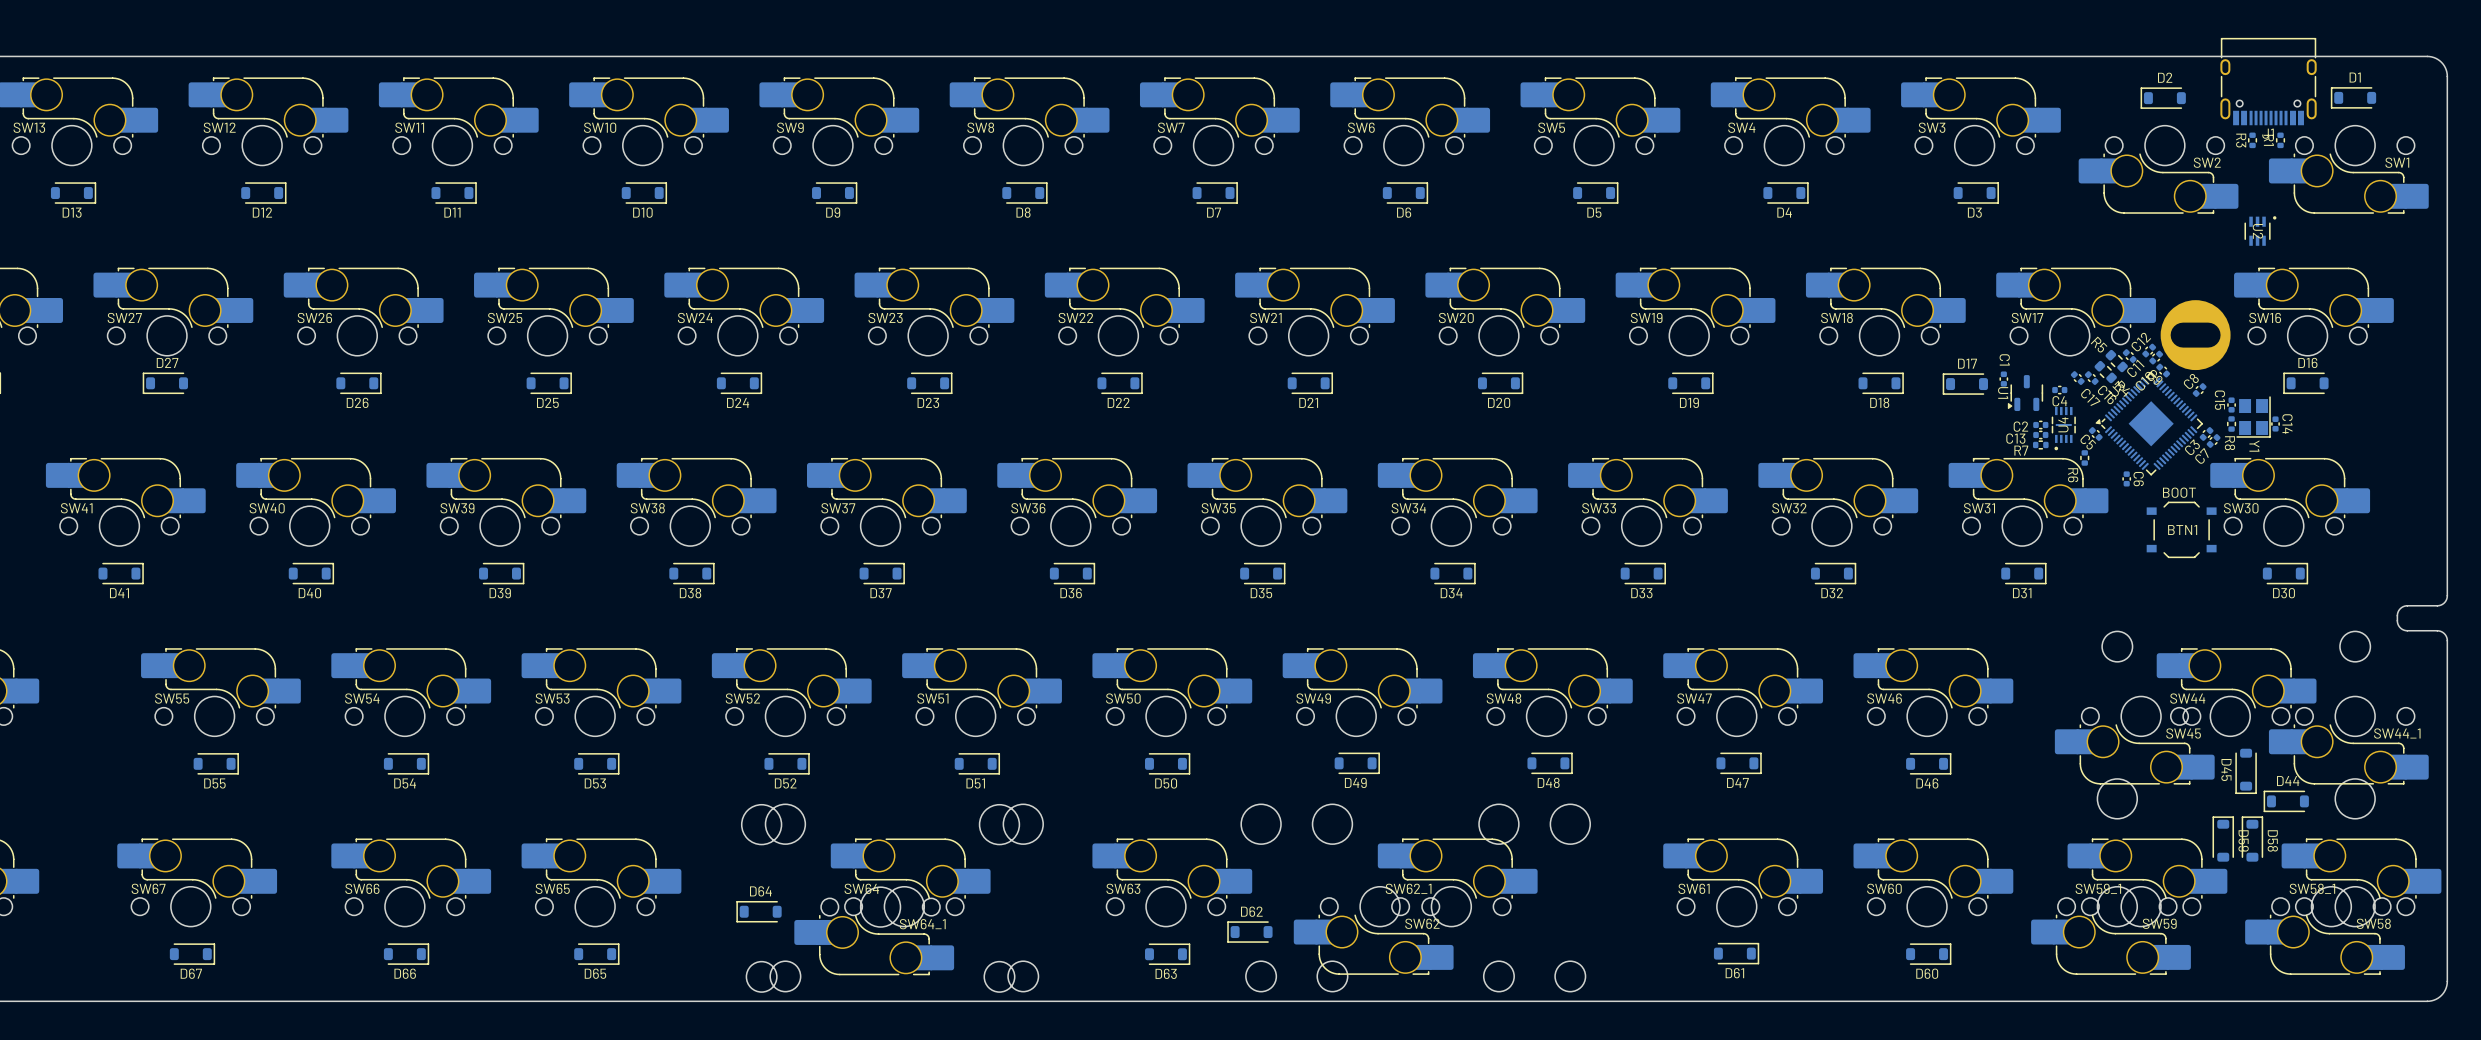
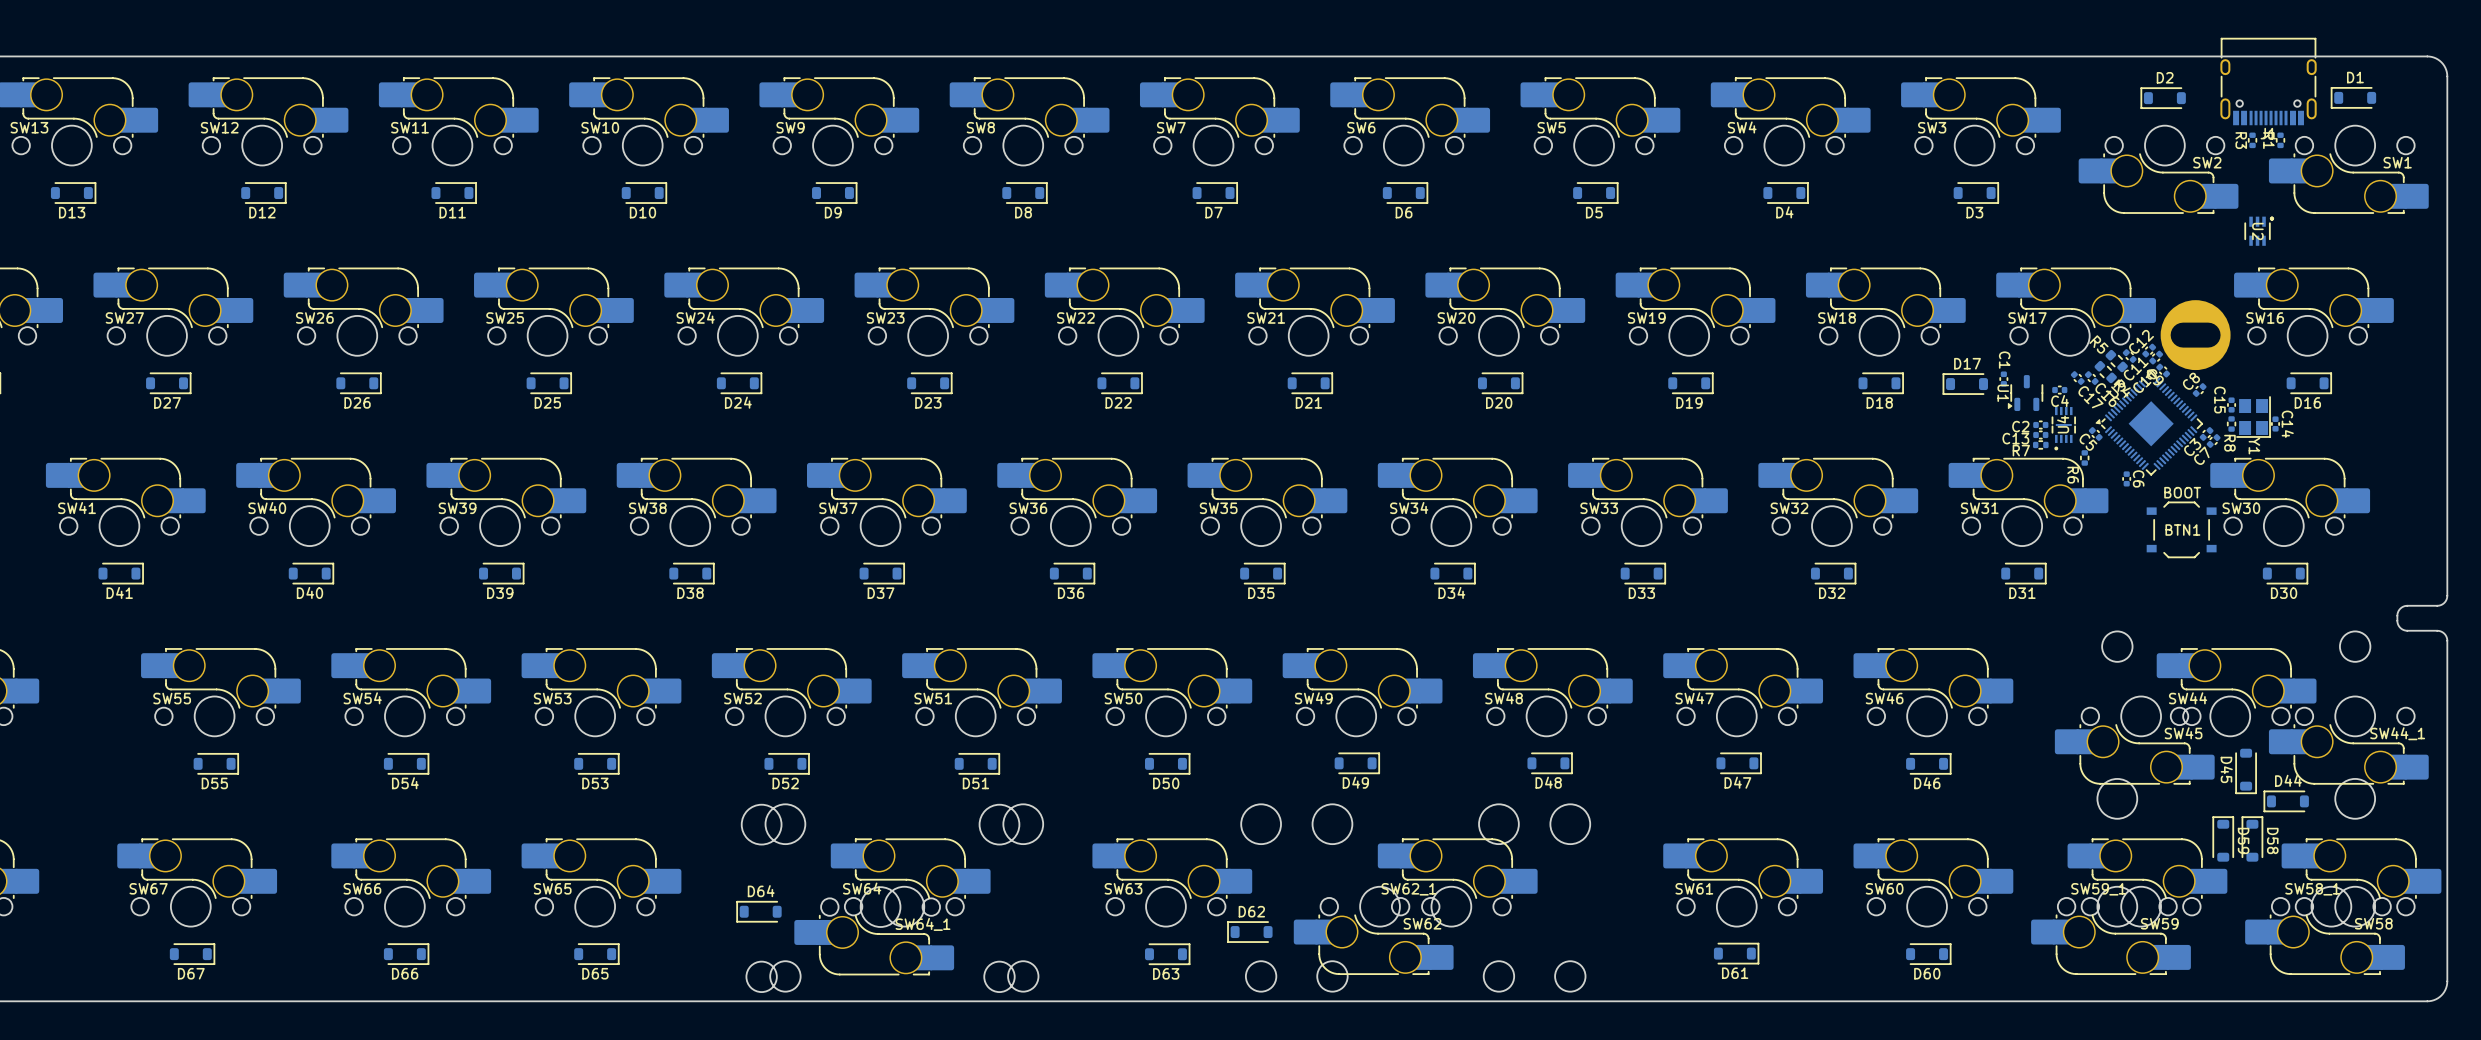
D27 rotation: 0° (165, 383) -> 180° (168, 383)
D16 rotation: 0° (2306, 383) -> 180° (2309, 383)

